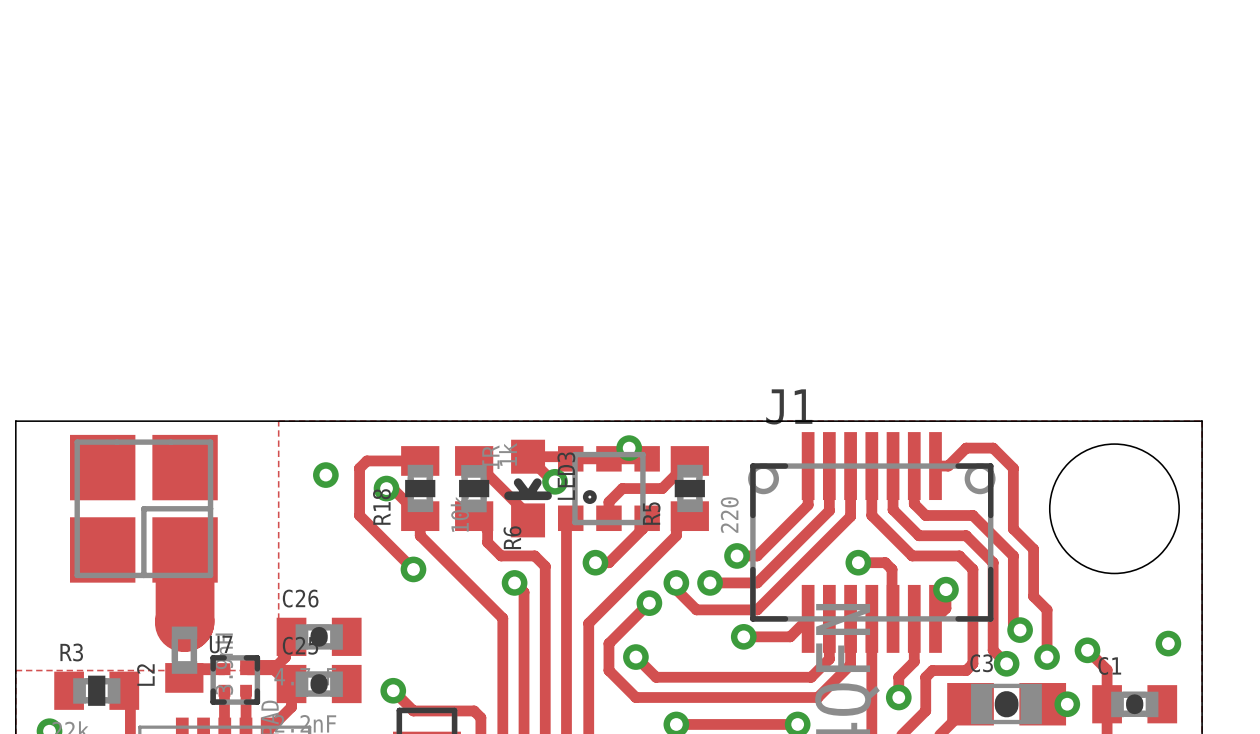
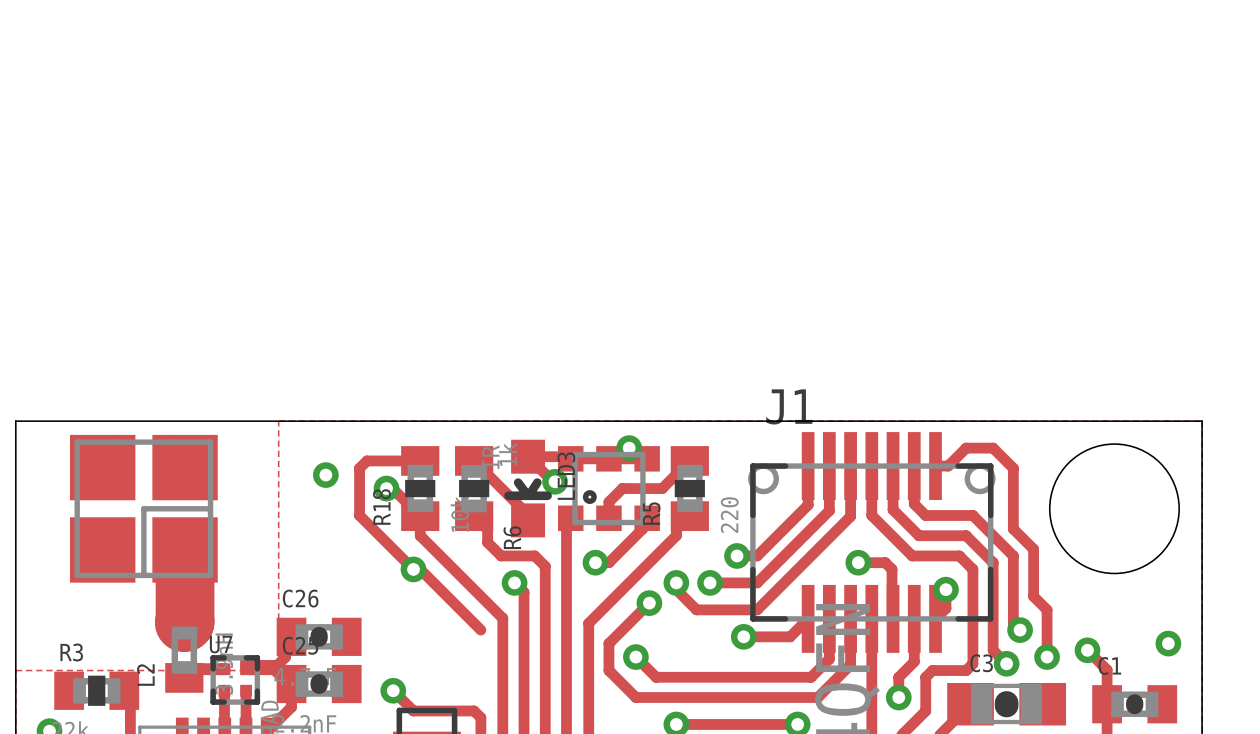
track: none -> (420, 569) (480, 630)
via: (1067, 704) -> none

